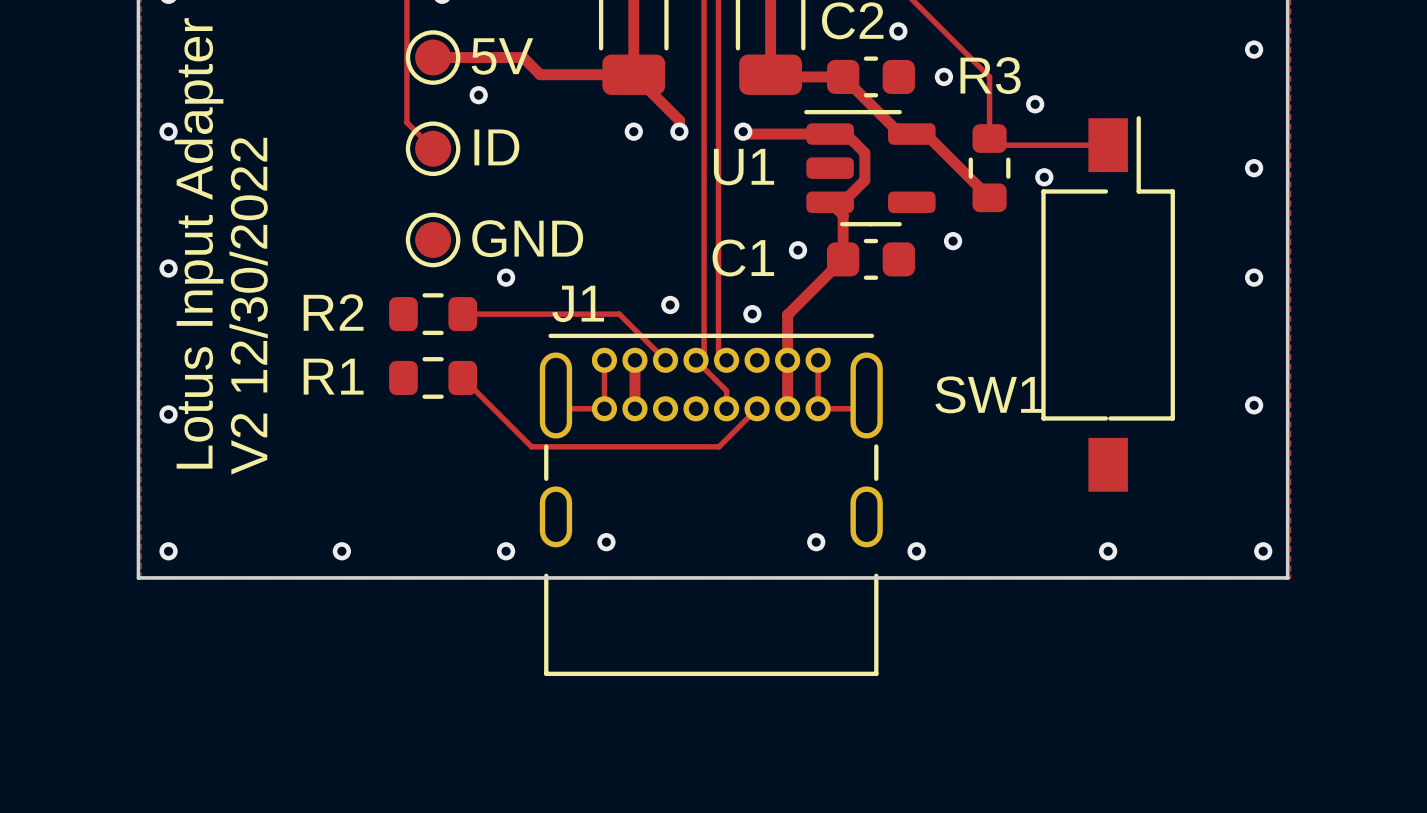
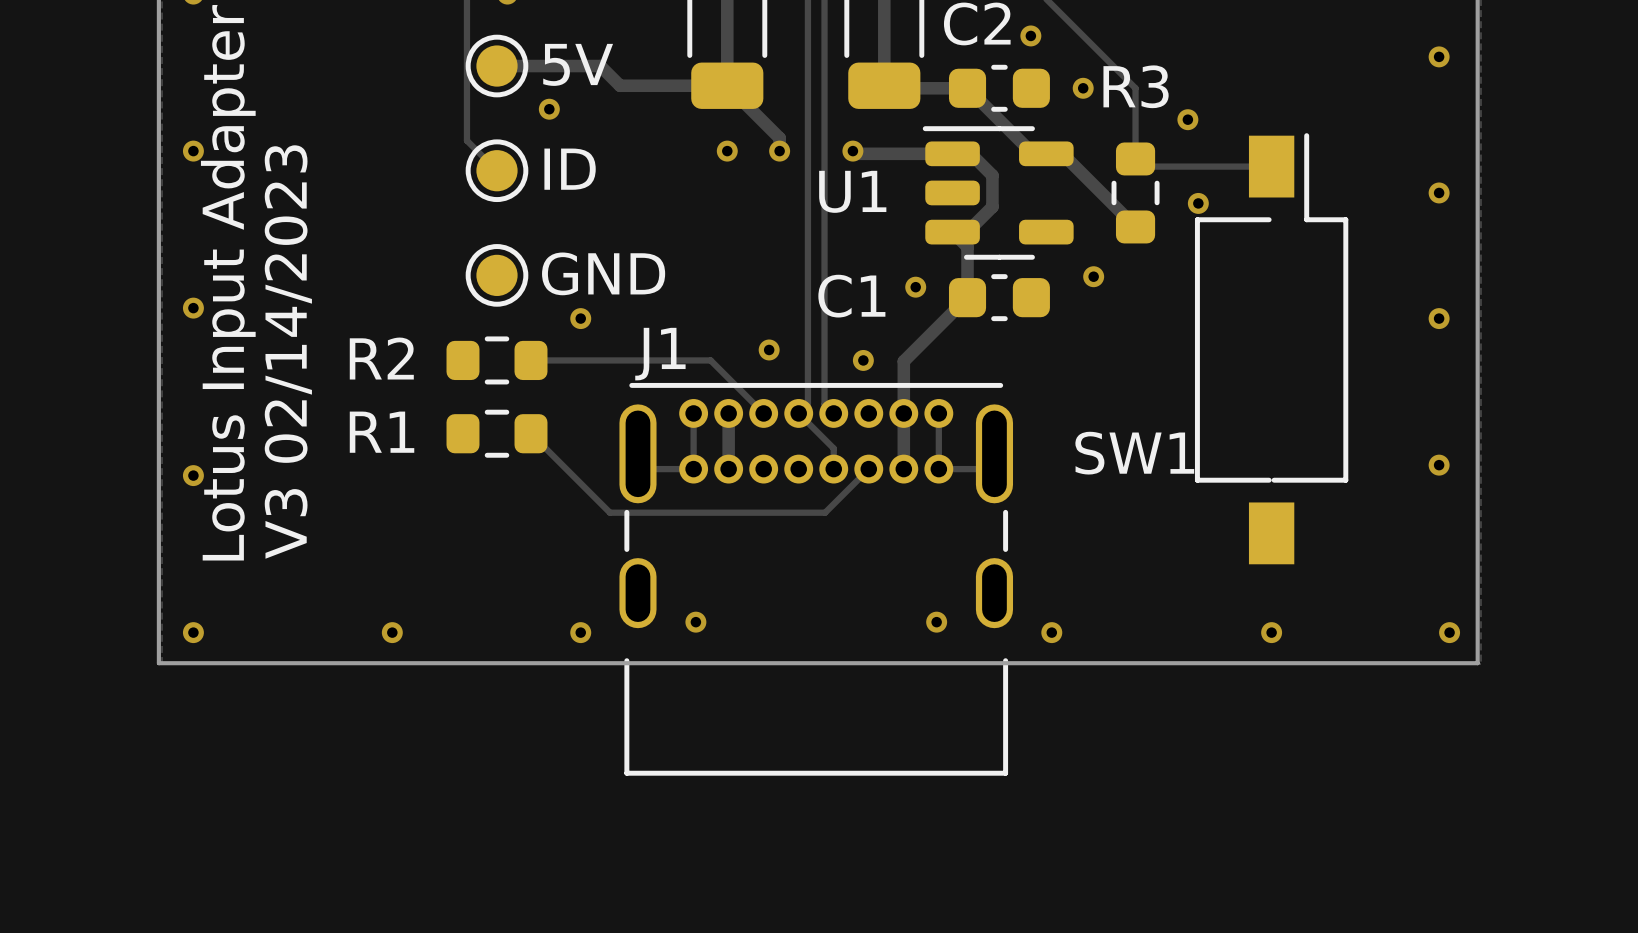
text: V2 12/30/2022 (248, 306) -> V3 02/14/2023 (288, 352)

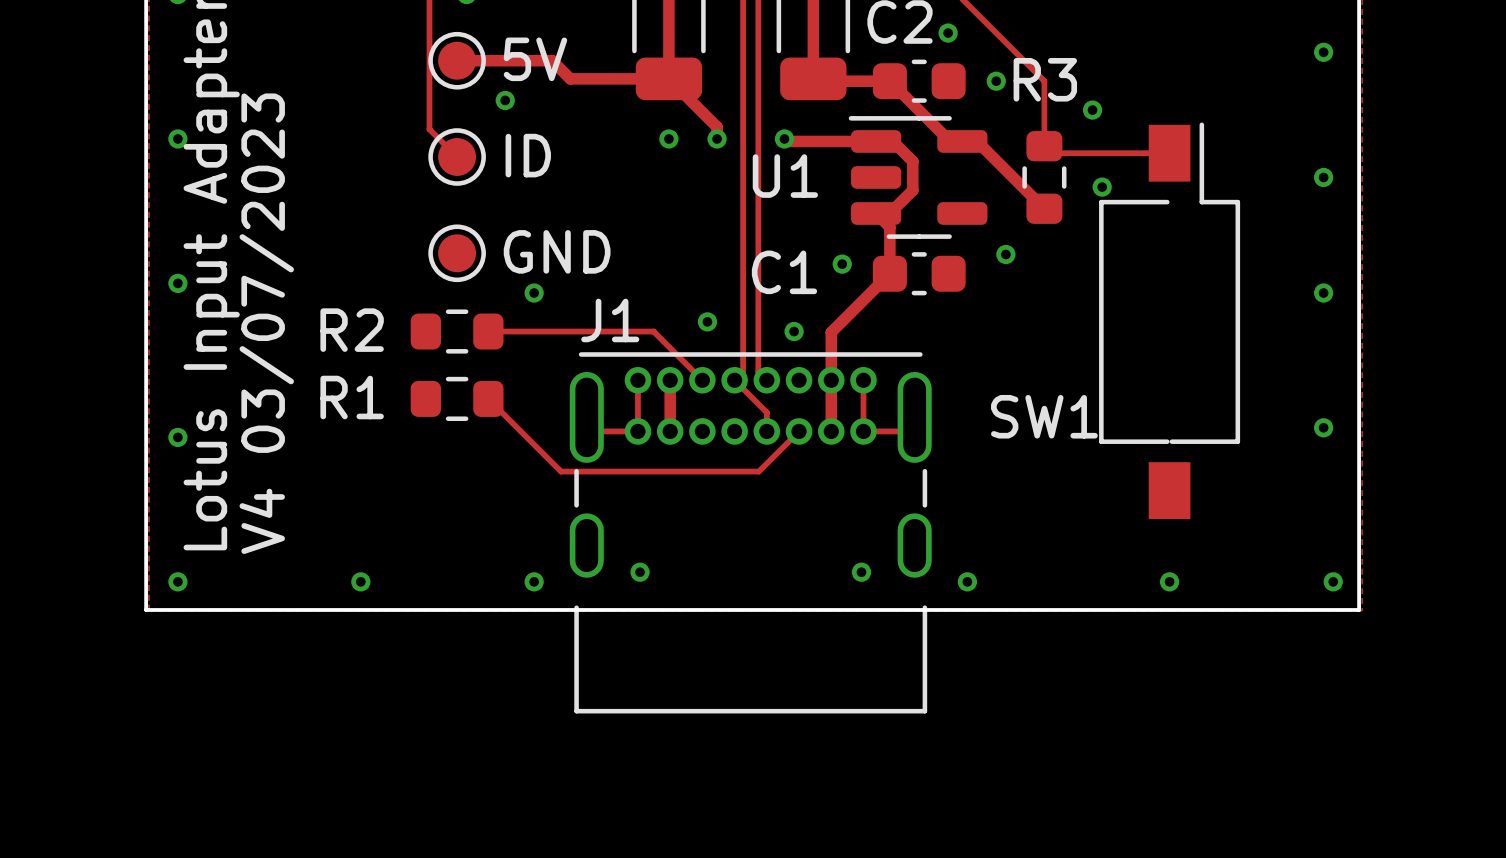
text: V3 02/14/2023 (288, 352) -> V4 03/07/2023 (266, 323)

